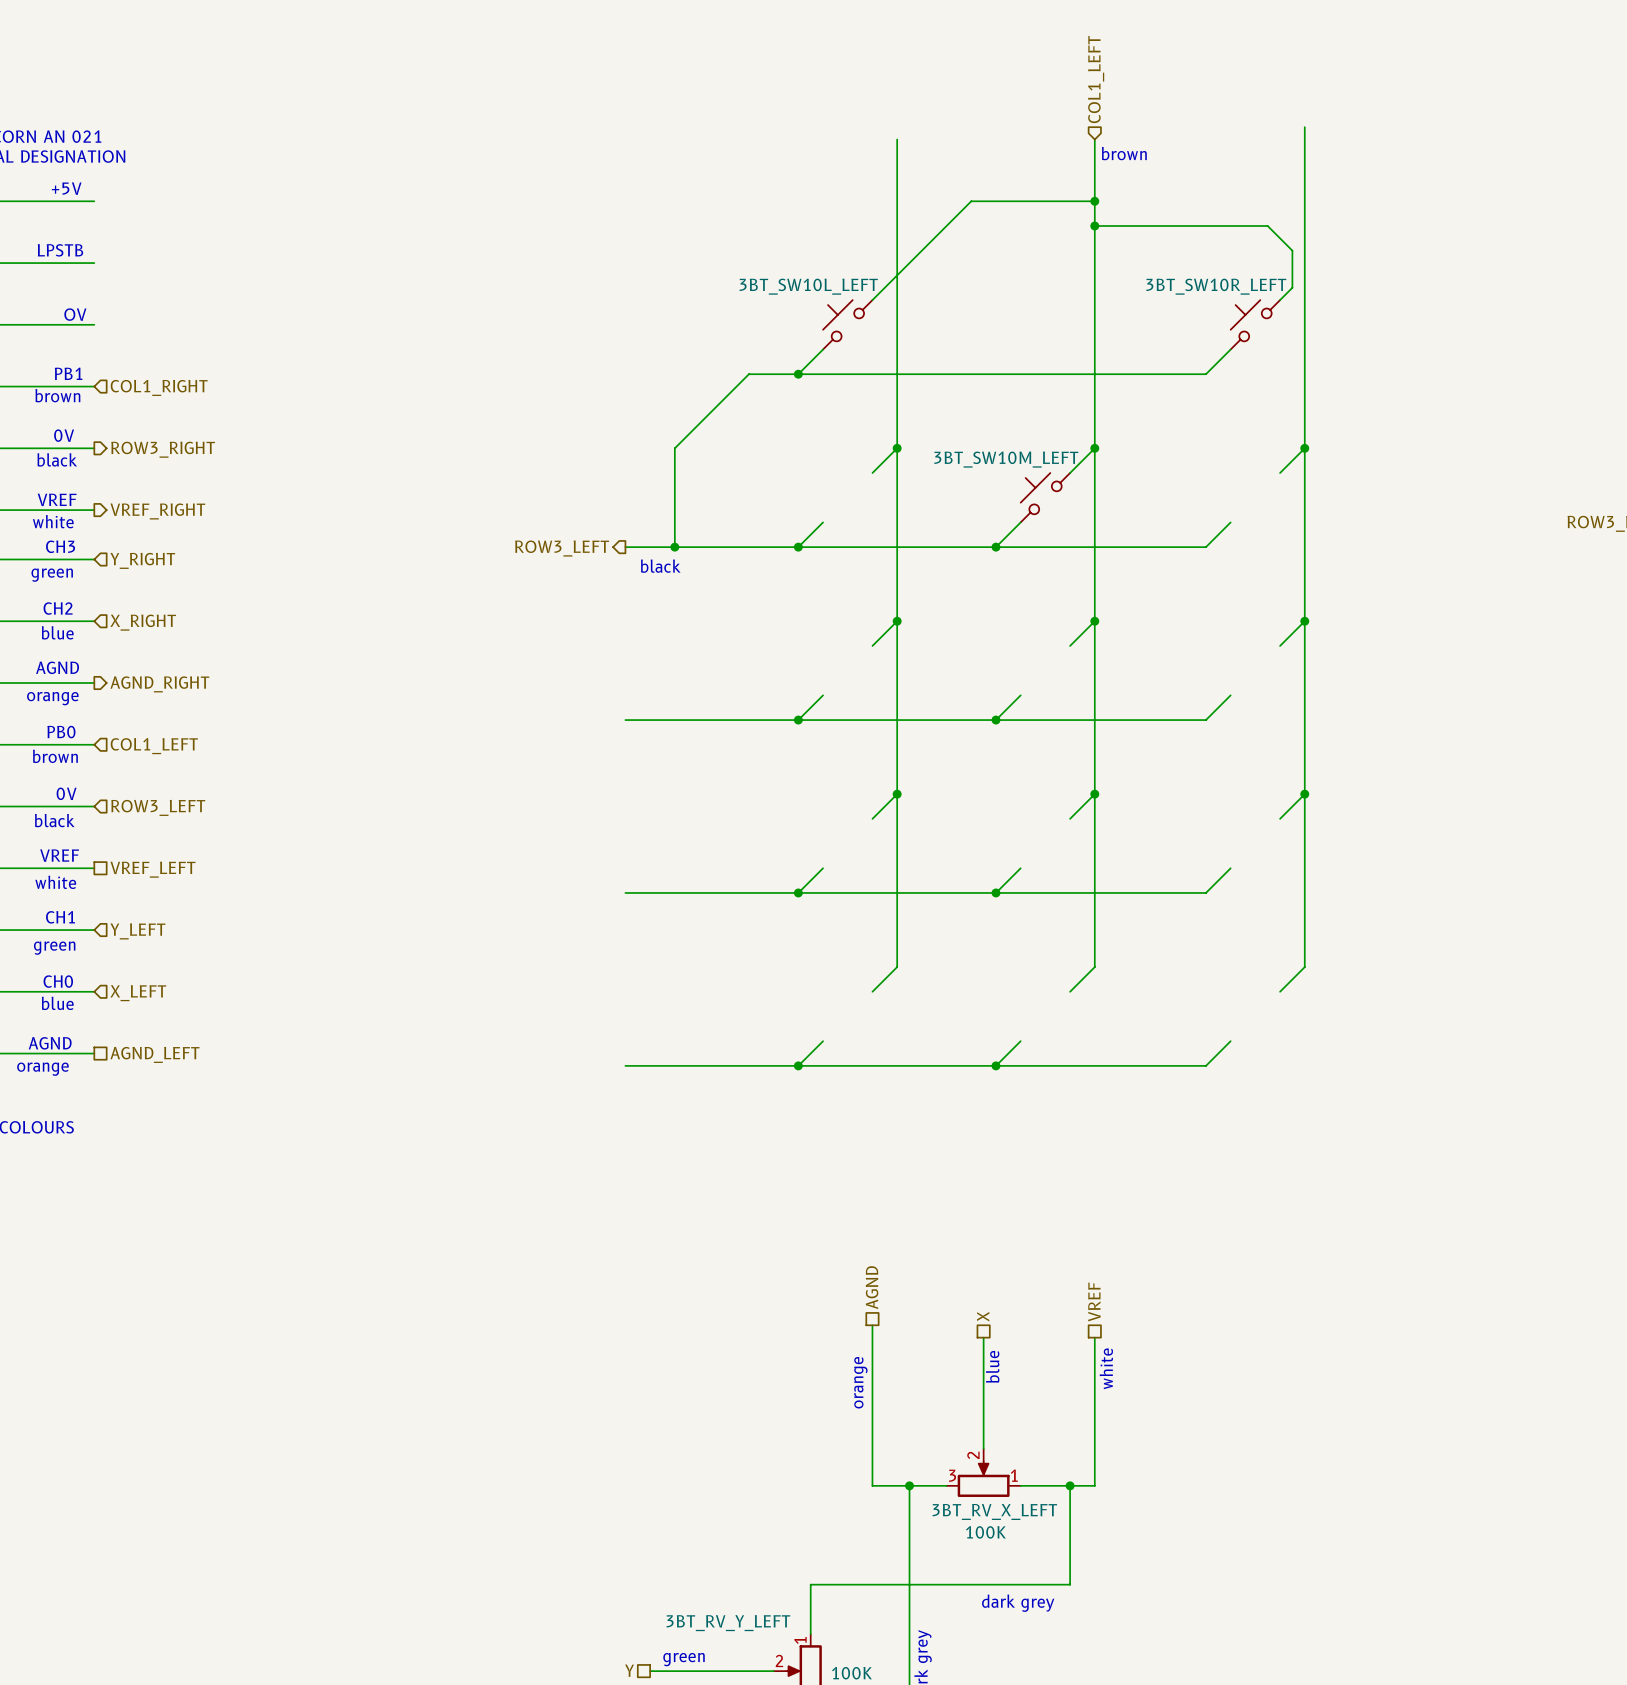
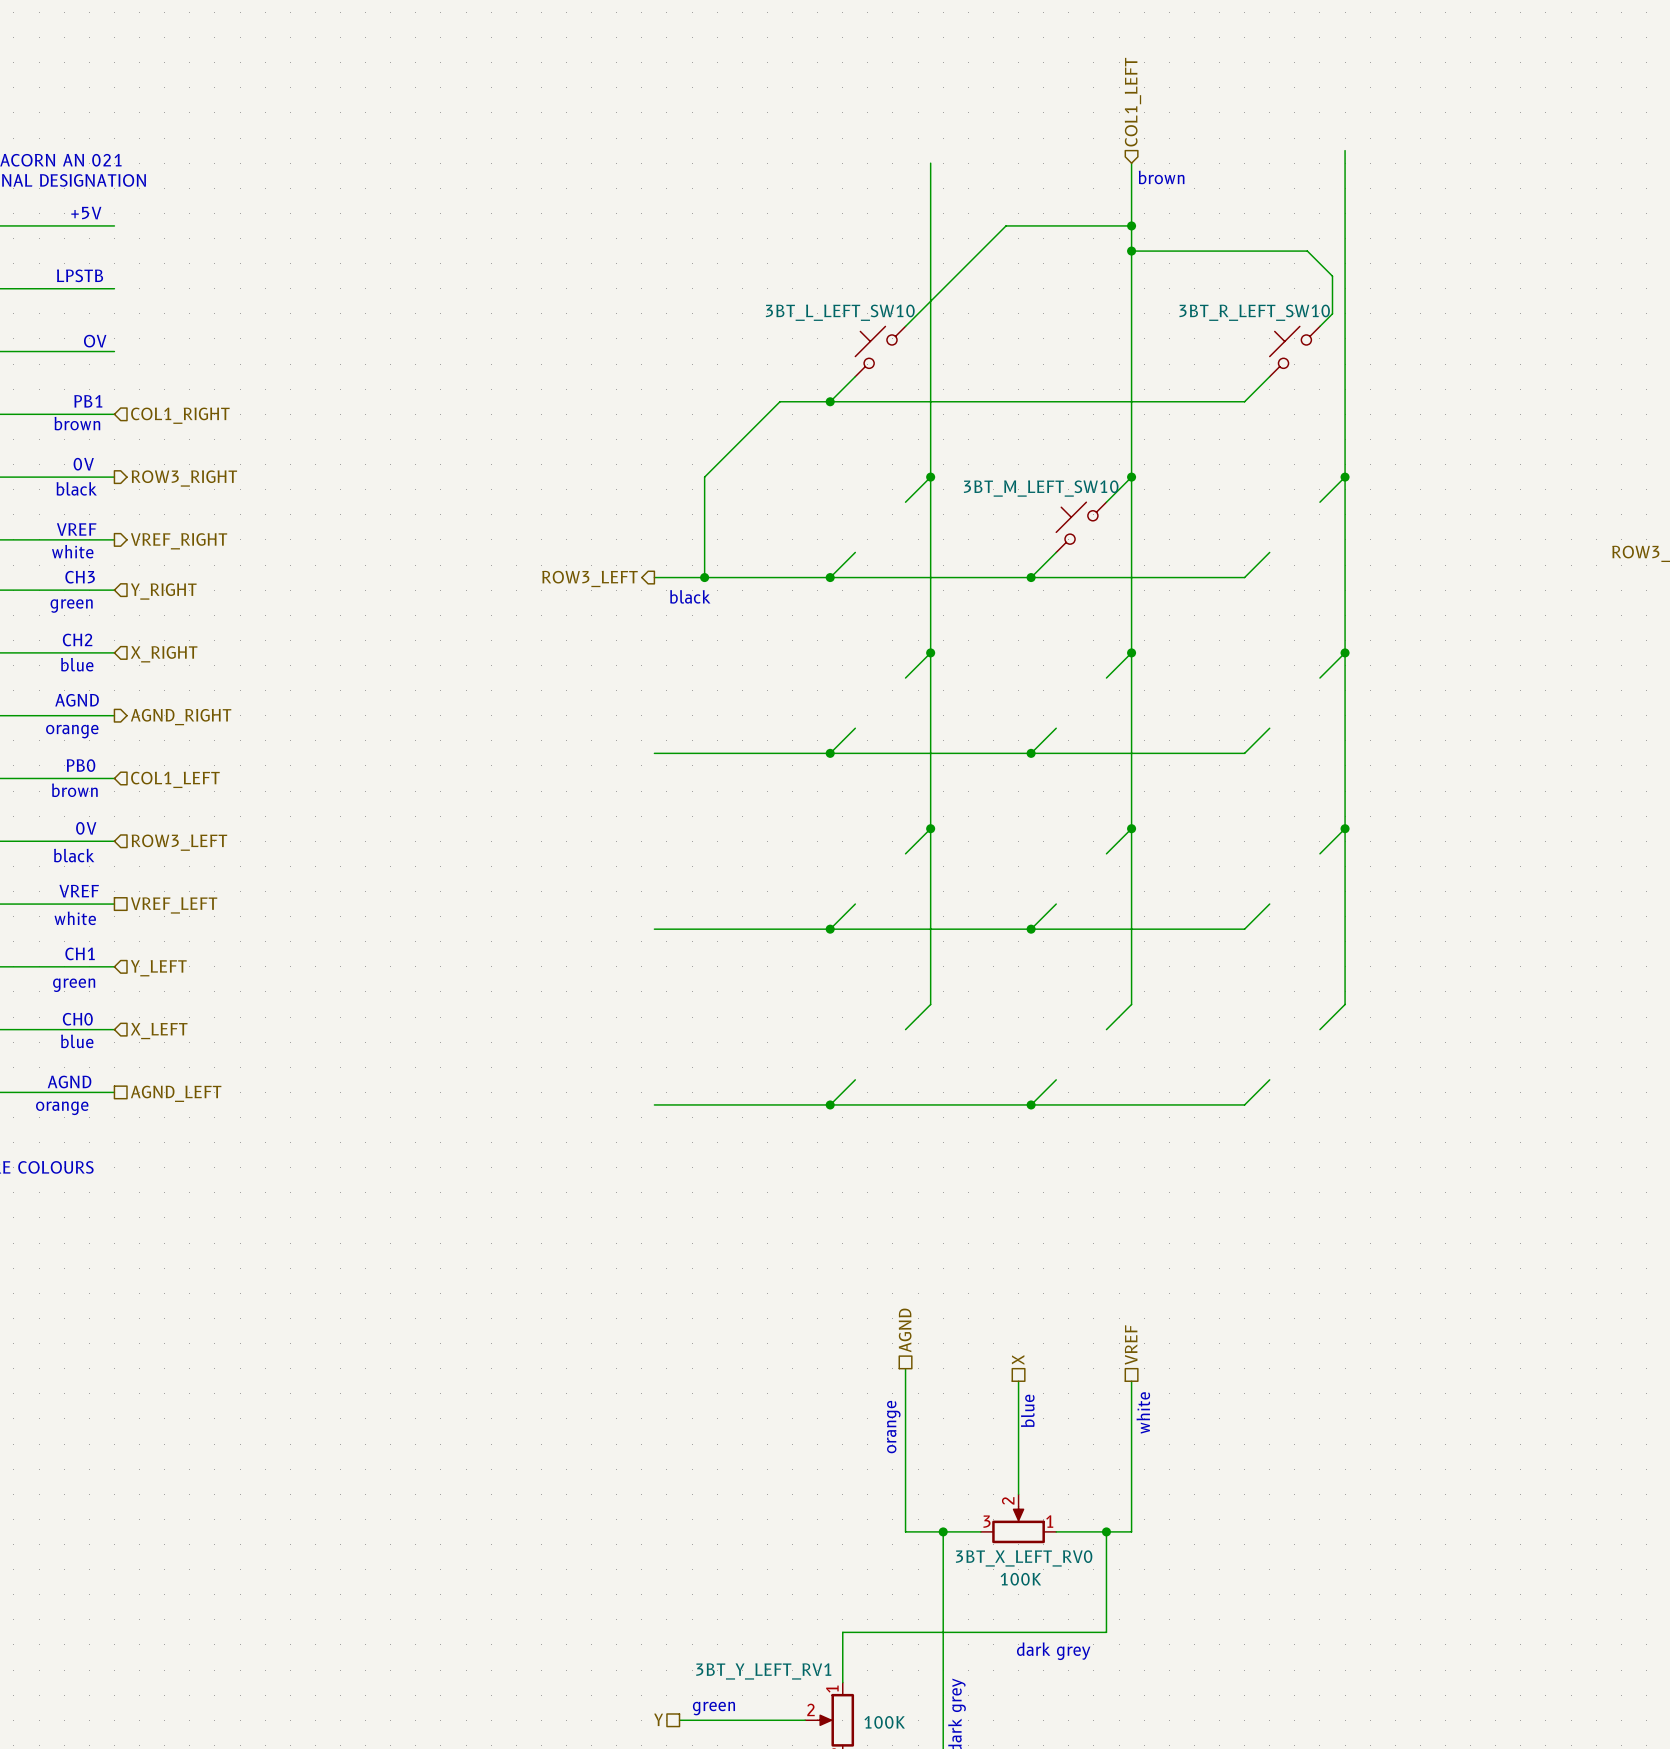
3BT_SW10L_LEFT name: 3BT_SW10L_LEFT (808, 286) -> 3BT_L_LEFT_SW10 (840, 312)
3BT_SW10R_LEFT name: 3BT_SW10R_LEFT (1216, 286) -> 3BT_R_LEFT_SW10 (1254, 312)
3BT_SW10M_LEFT name: 3BT_SW10M_LEFT (1006, 459) -> 3BT_M_LEFT_SW10 (1041, 488)
3BT_RV_X_LEFT name: 3BT_RV_X_LEFT (994, 1511) -> 3BT_X_LEFT_RV0 (1024, 1558)
3BT_RV_Y_LEFT name: 3BT_RV_Y_LEFT (728, 1623) -> 3BT_Y_LEFT_RV1 (763, 1671)

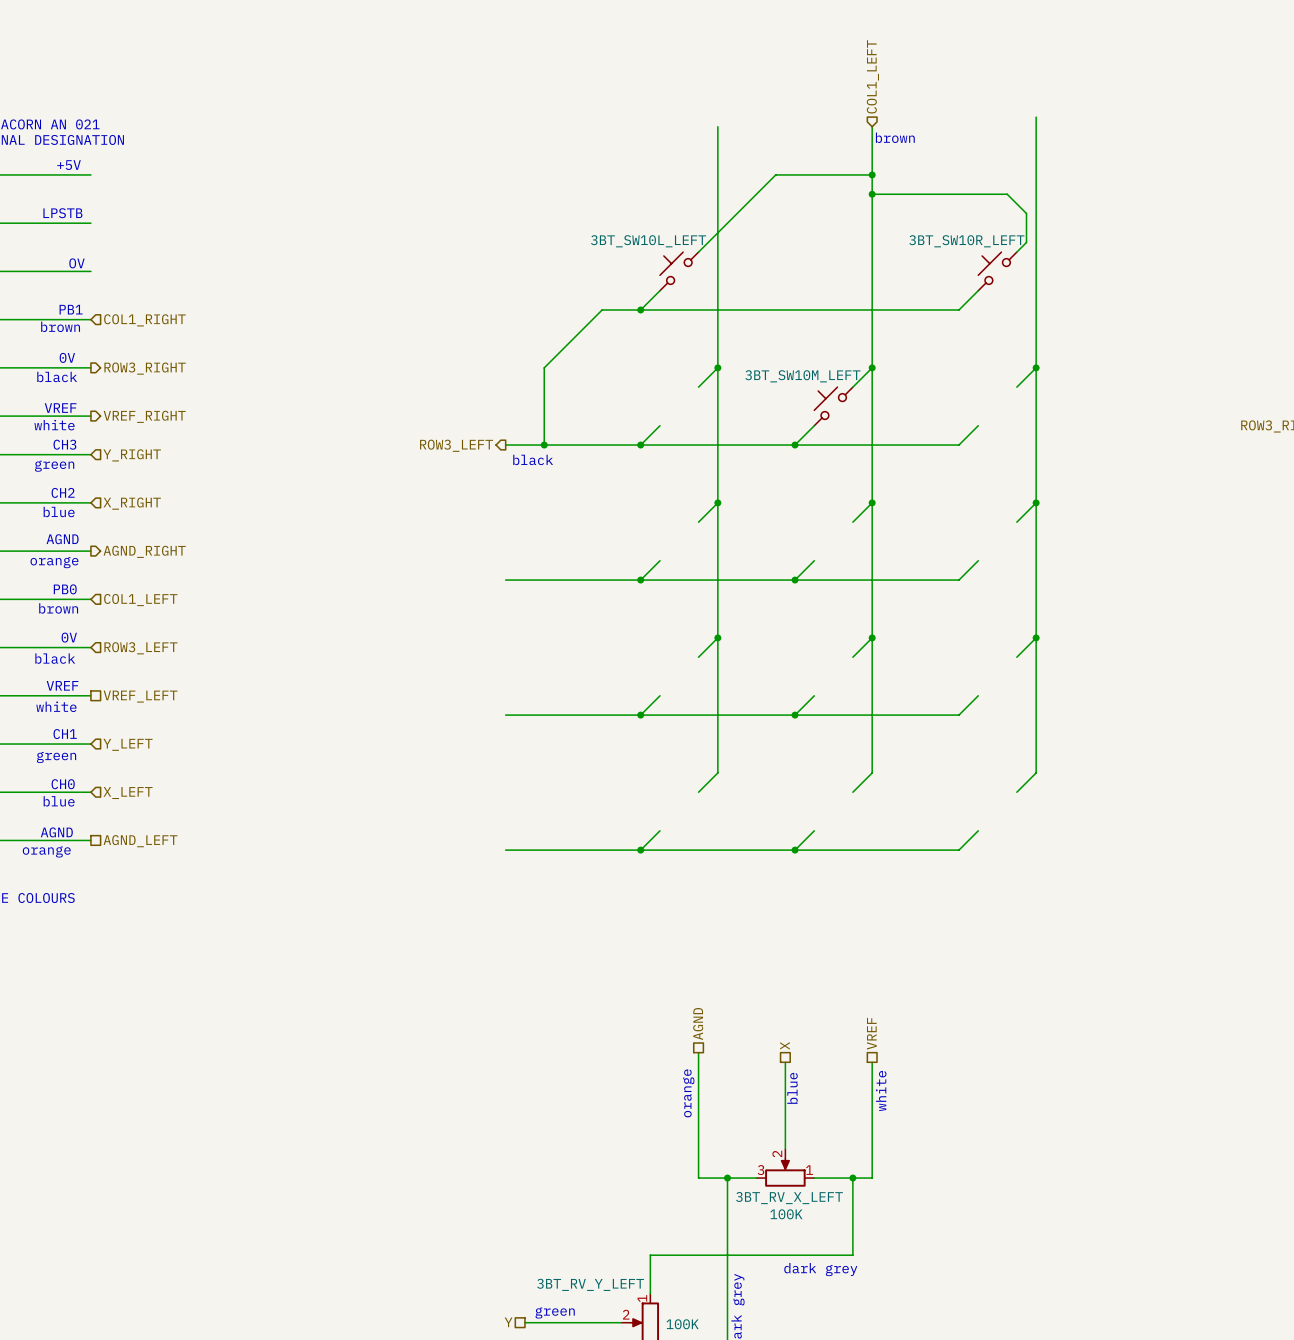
3BT_L_LEFT_SW10 name: 3BT_L_LEFT_SW10 (840, 312) -> 3BT_SW10L_LEFT (648, 241)
3BT_R_LEFT_SW10 name: 3BT_R_LEFT_SW10 (1254, 312) -> 3BT_SW10R_LEFT (966, 241)
3BT_M_LEFT_SW10 name: 3BT_M_LEFT_SW10 (1041, 488) -> 3BT_SW10M_LEFT (802, 376)
3BT_X_LEFT_RV0 name: 3BT_X_LEFT_RV0 (1024, 1558) -> 3BT_RV_X_LEFT (789, 1198)
3BT_Y_LEFT_RV1 name: 3BT_Y_LEFT_RV1 (763, 1671) -> 3BT_RV_Y_LEFT (590, 1284)

